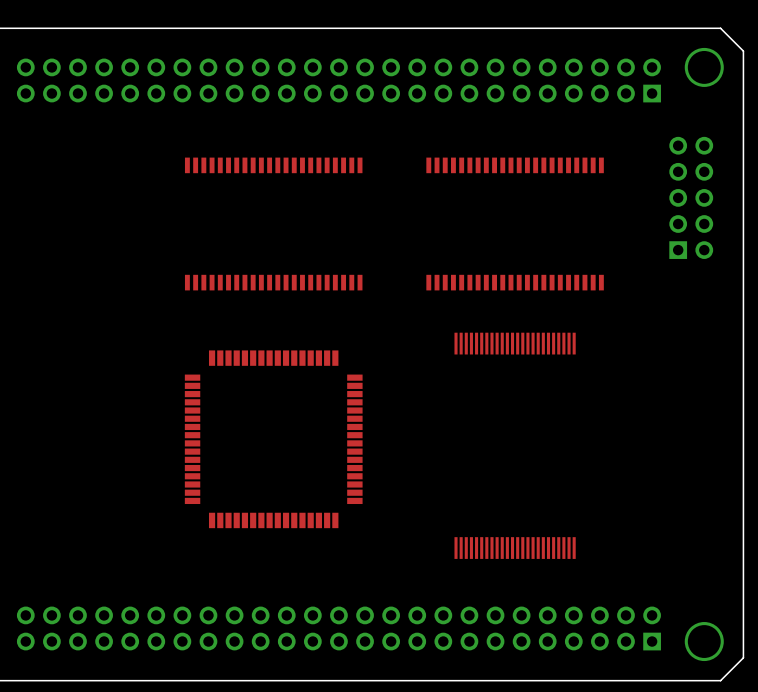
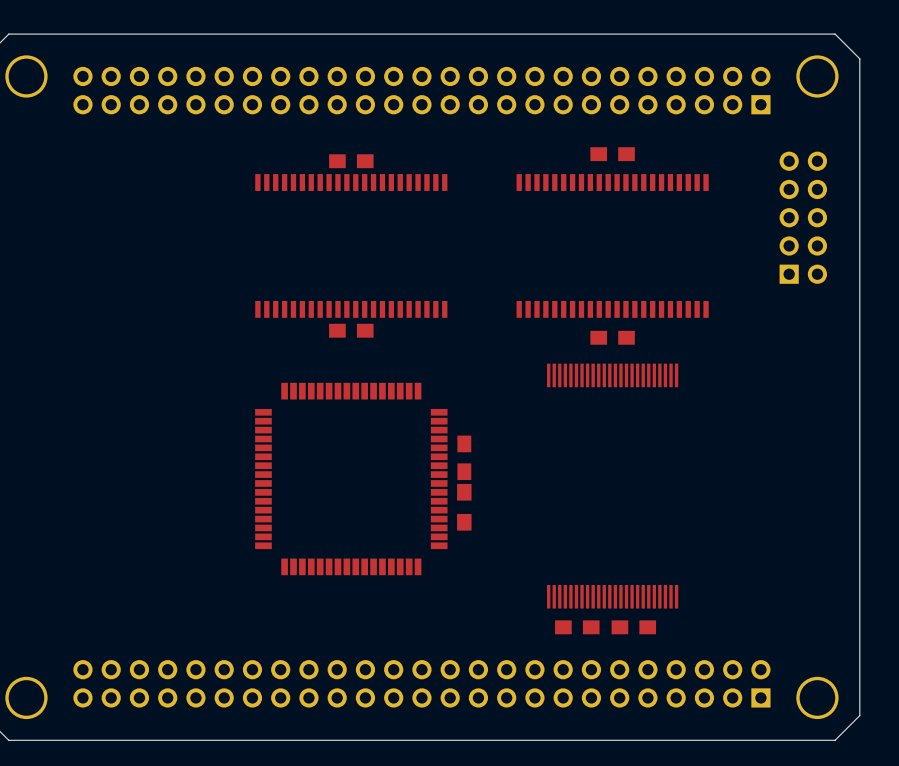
part: none -> (612, 154)
part: none -> (351, 161)
part: none -> (351, 330)
part: none -> (612, 337)
part: none -> (464, 457)
part: none -> (464, 507)
part: none -> (577, 627)
part: none -> (633, 627)

